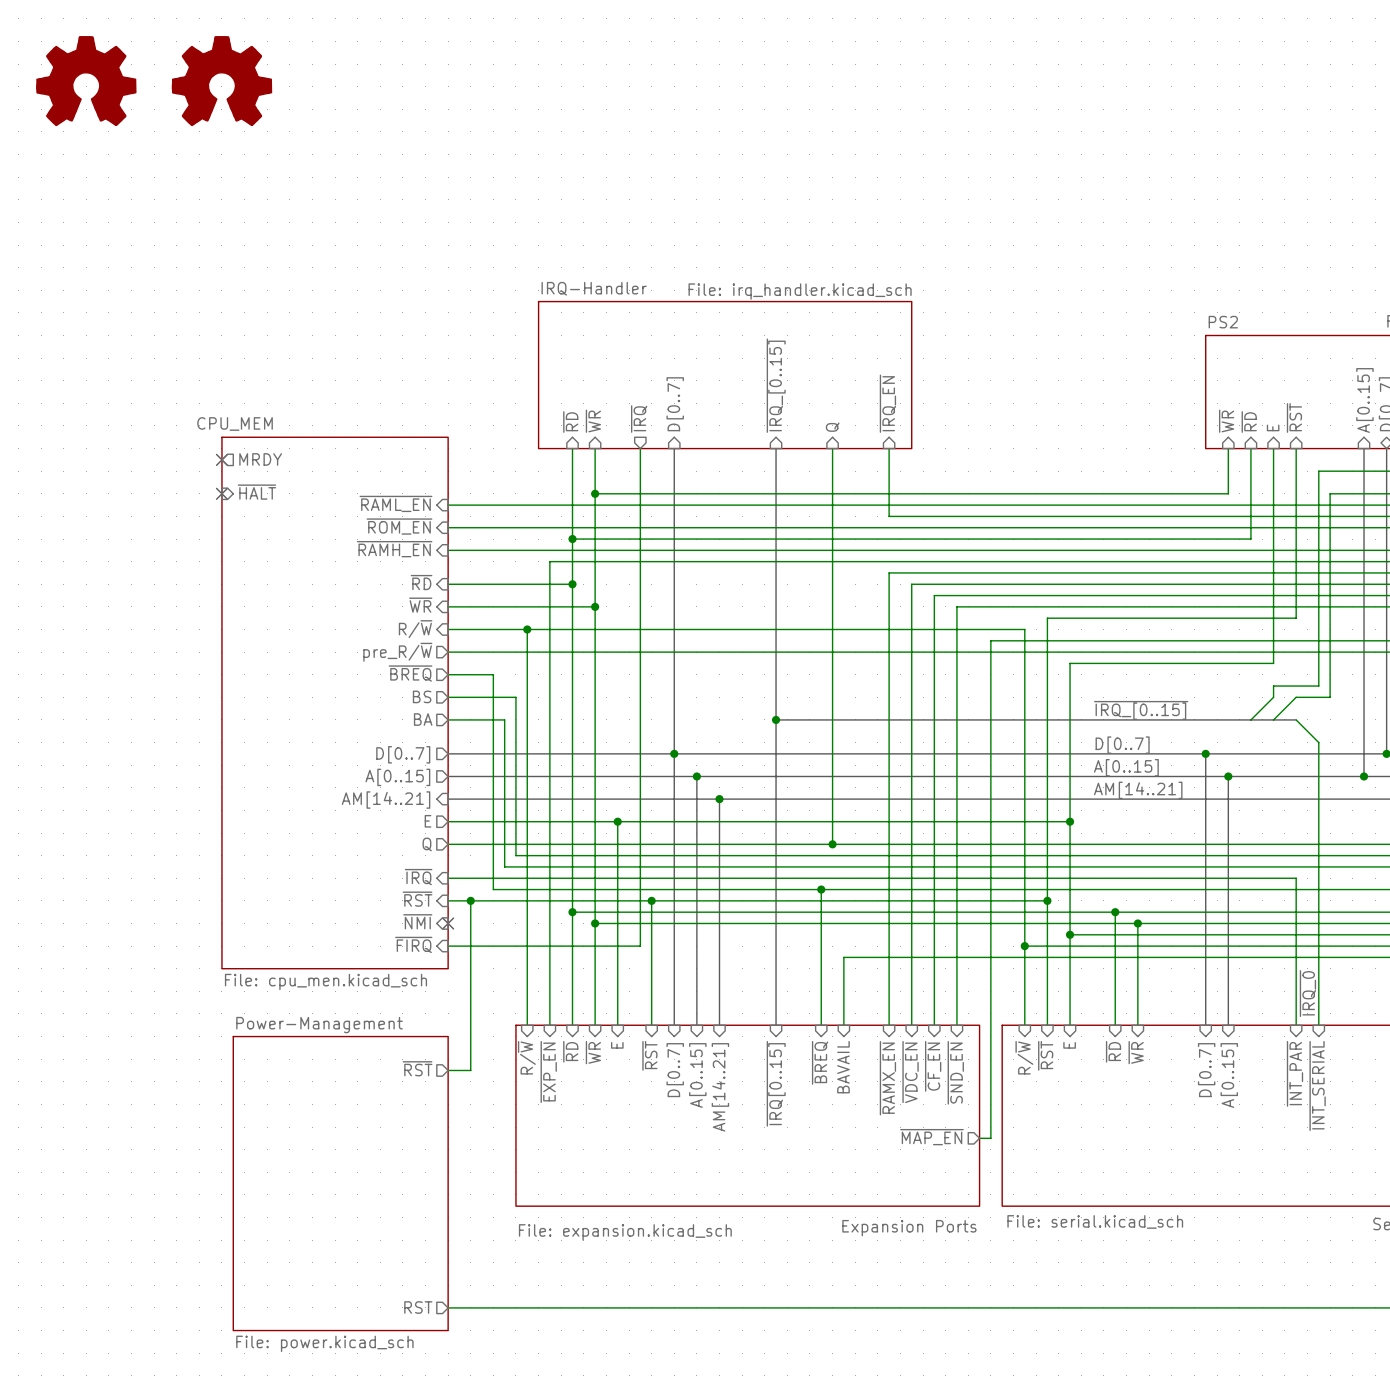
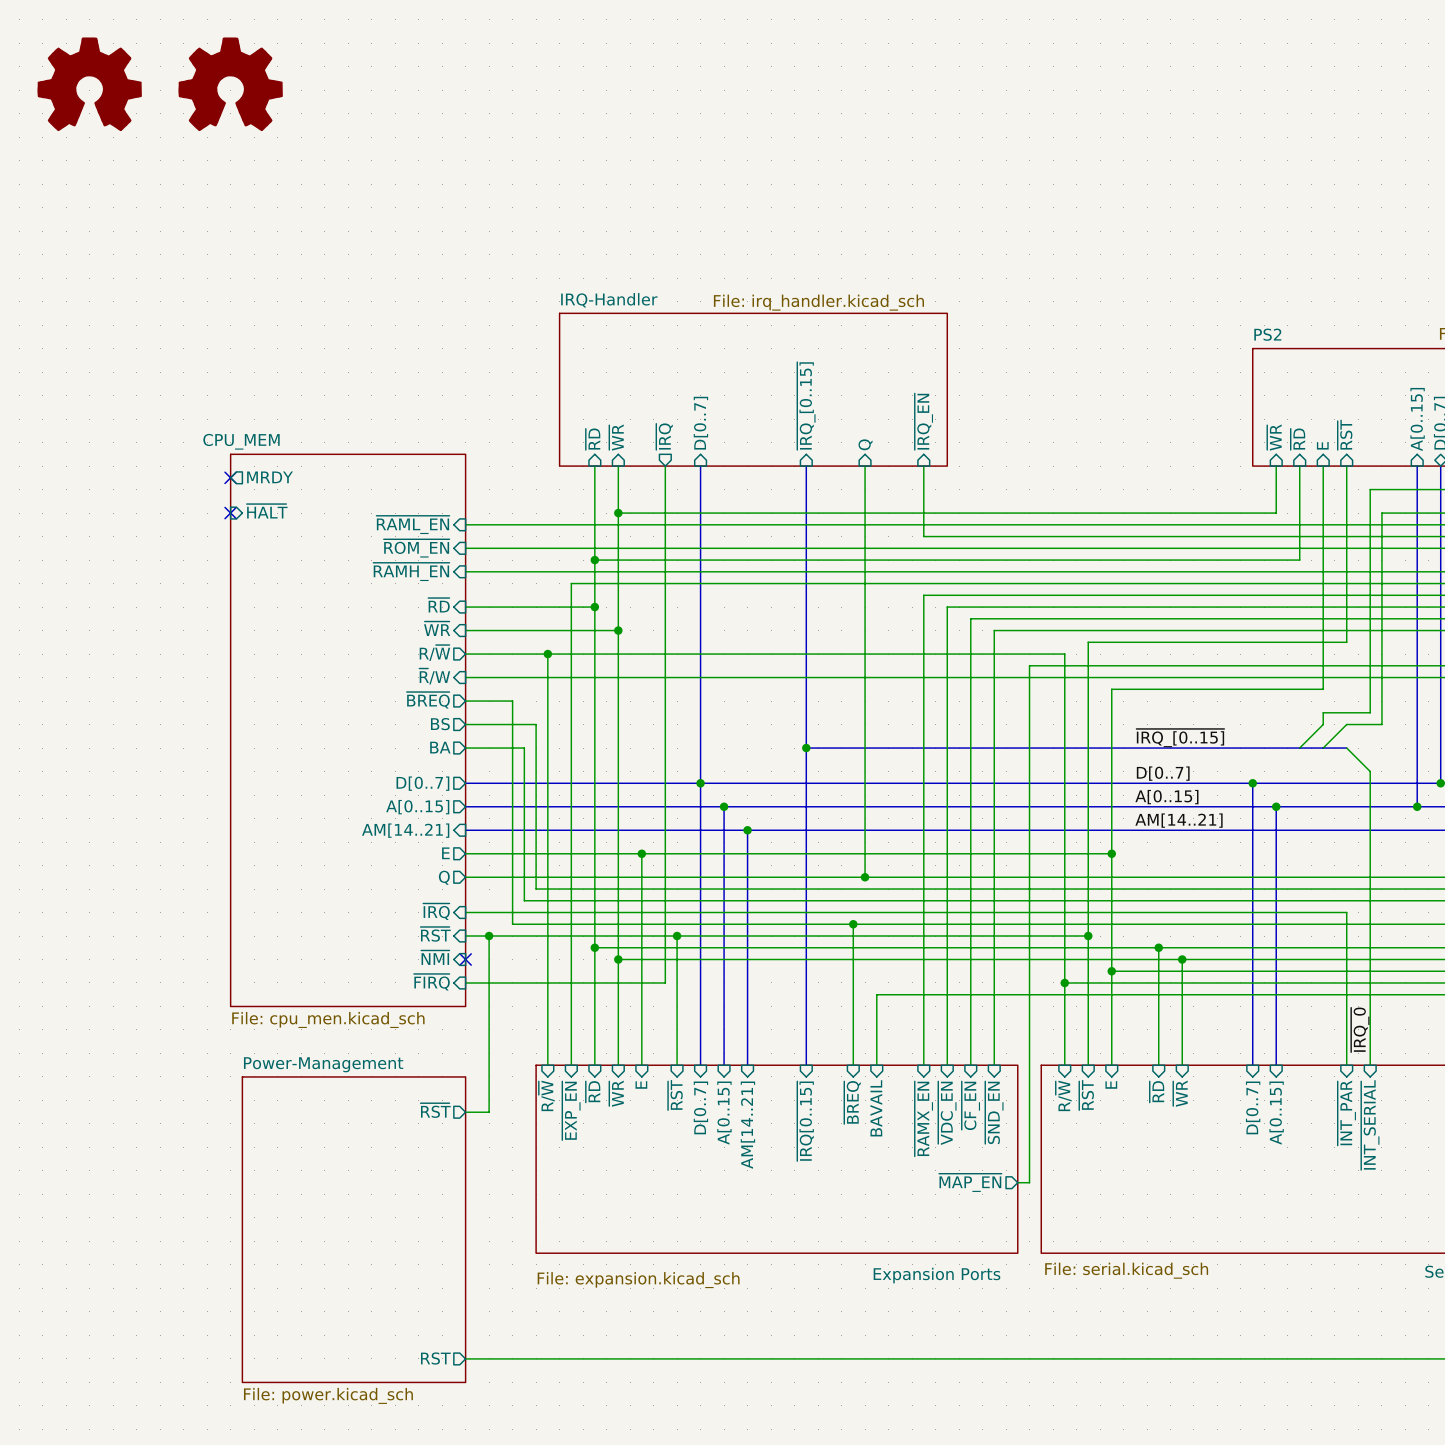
sheet pin shape: input (415, 629) -> output (434, 653)
sheet pin shape: output (397, 652) -> input (434, 676)
sheet pin: pre_R/~{W} (397, 652) -> ~{R}/W (434, 676)

